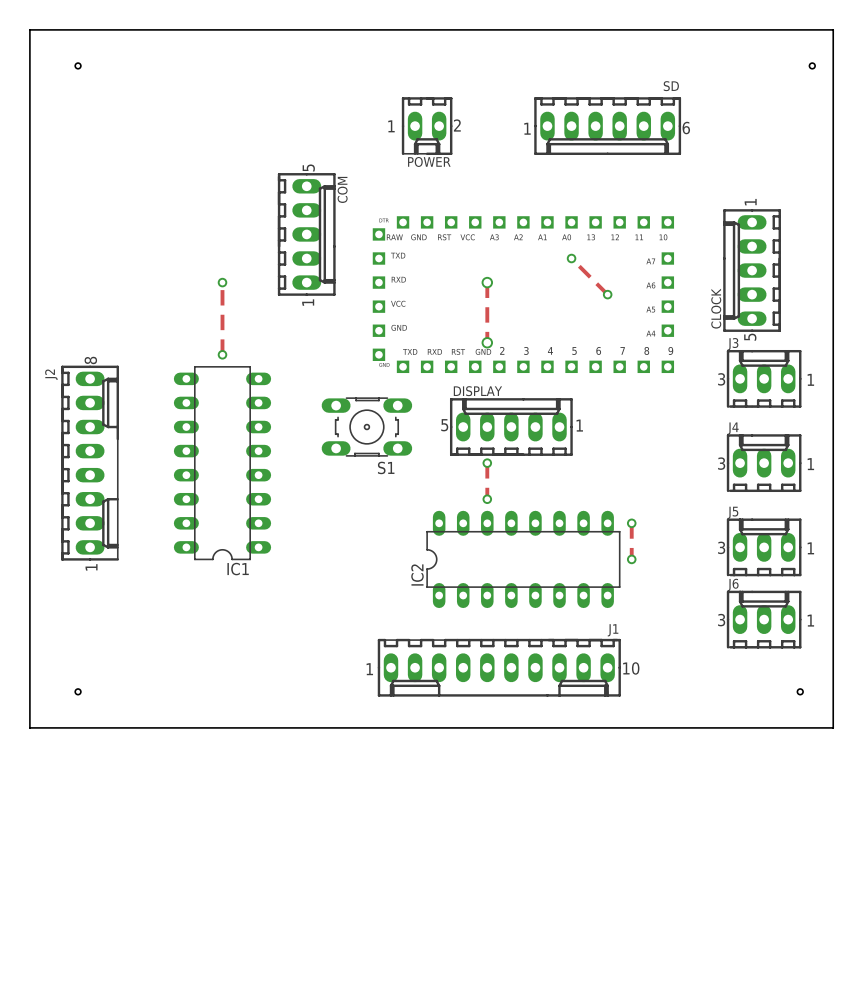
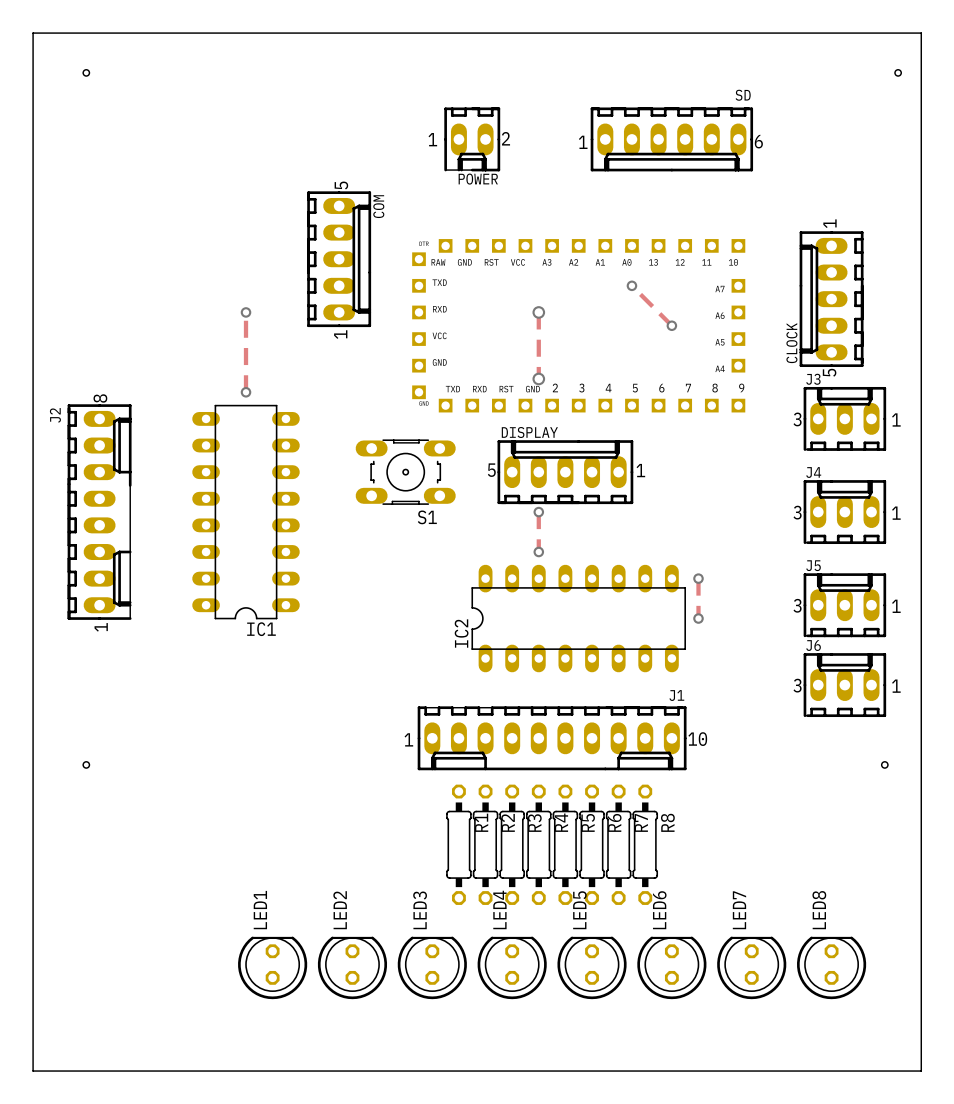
board edge: (29, 727) (833, 727) -> (33, 804) (33, 1071) (921, 1071) (921, 804)
R1: none -> (458, 844)
R2: none -> (485, 844)
R3: none -> (512, 844)
R4: none -> (538, 844)
R5: none -> (565, 844)
R6: none -> (592, 844)
R7: none -> (618, 844)
R8: none -> (645, 844)
LED1: none -> (272, 967)
LED2: none -> (352, 967)
LED3: none -> (432, 967)
LED4: none -> (512, 967)
LED5: none -> (592, 967)
LED6: none -> (671, 967)
LED7: none -> (751, 967)
LED8: none -> (831, 967)

